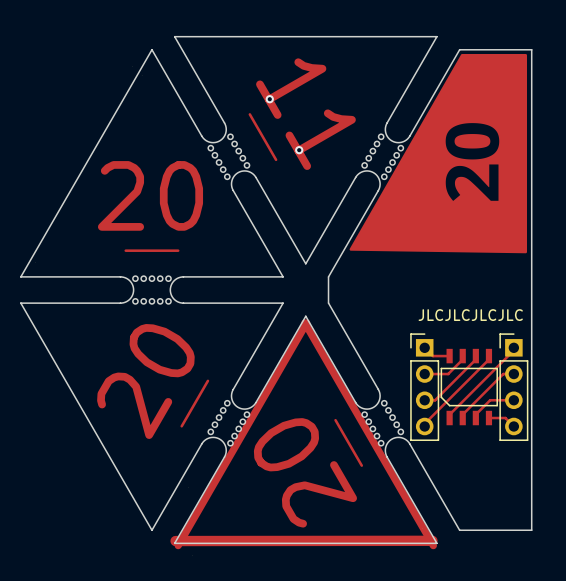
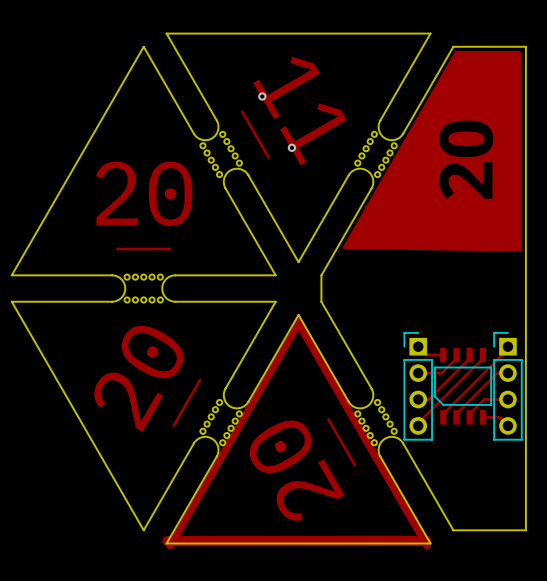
text: JLCJLCJLCJLC (470, 315) -> none

